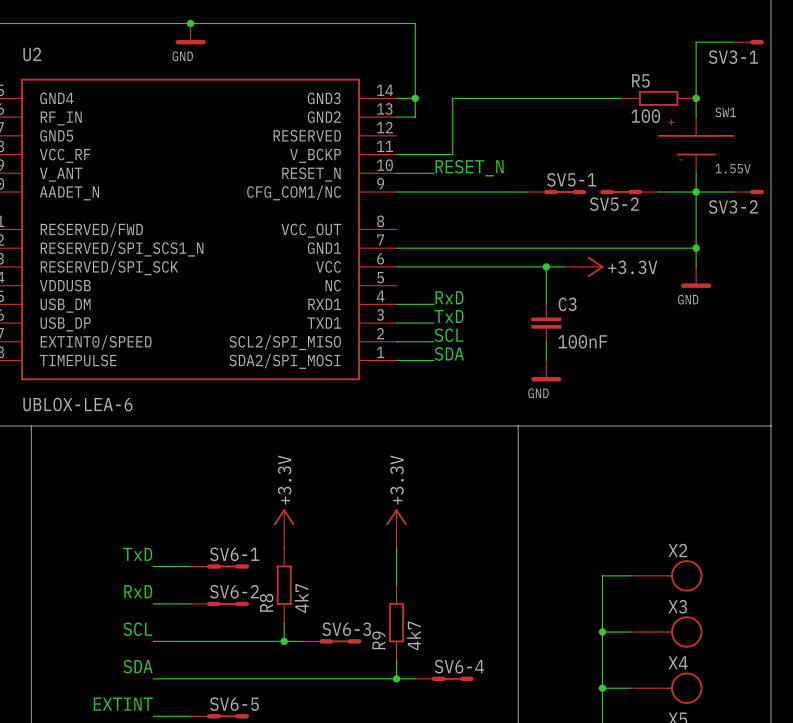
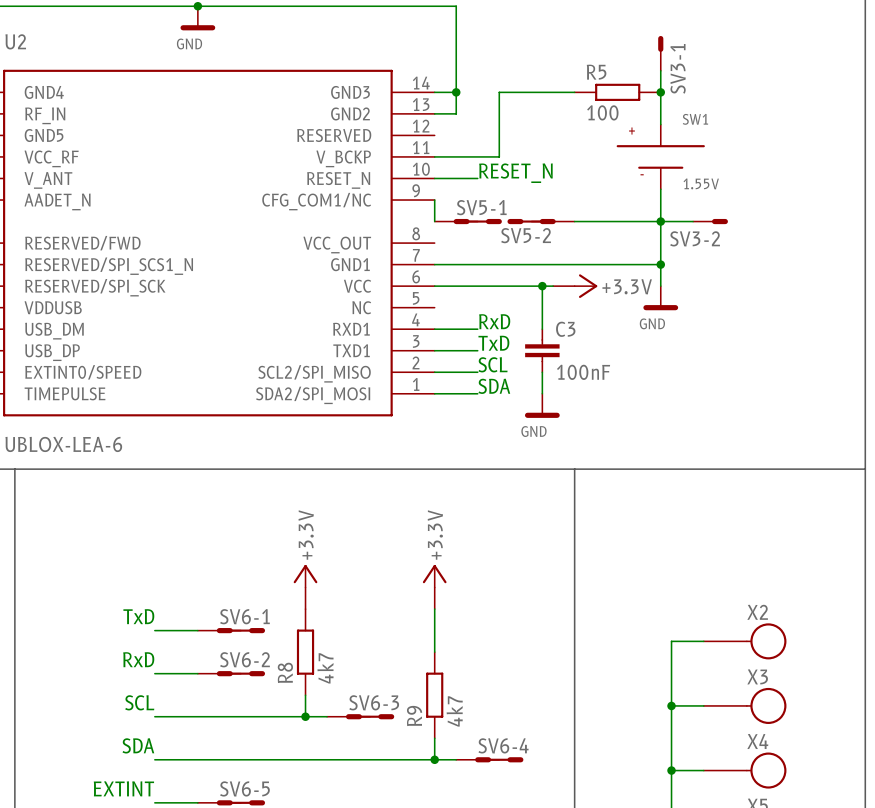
wire: (733, 42) (696, 42) (696, 117) -> none
SV3-1 position: (748, 42) -> (660, 53)
SV3-1 rotation: 0° (756, 42) -> 90° counterclockwise (660, 43)
wire: none -> (660, 70) (660, 124)
wire: (518, 98) (621, 98) -> none
junction: none -> (660, 92)
R5 position: (658, 98) -> (617, 92)
junction: (696, 98) -> none
SW1 position: (696, 145) -> (660, 156)
wire: (696, 173) (696, 266) -> none
wire: none -> (660, 189) (660, 286)
wire: (396, 192) (527, 192) -> (434, 200) (434, 221)
SV5-1 position: (556, 192) -> (468, 221)
SV5-2 position: (629, 192) -> (541, 221)
wire: (658, 192) (733, 192) -> none
junction: (696, 192) -> none
SV3-2 position: (748, 192) -> (710, 221)
junction: none -> (660, 221)
wire: (593, 248) (696, 248) -> (574, 221) (693, 221)
junction: none -> (660, 264)
junction: (696, 248) -> none
junction: none -> (542, 286)
wire: (546, 266) (546, 304) -> (542, 286) (542, 329)
junction: (546, 266) -> none
power symbol position: +3.3V (584, 266) -> +3.3V (575, 286)
power symbol: none -> (660, 298)
power symbol: (696, 277) -> none
C3 position: (546, 323) -> (542, 350)
wire: (546, 341) (546, 360) -> (542, 372) (542, 393)
power symbol: none -> (542, 405)
power symbol: (546, 371) -> none

